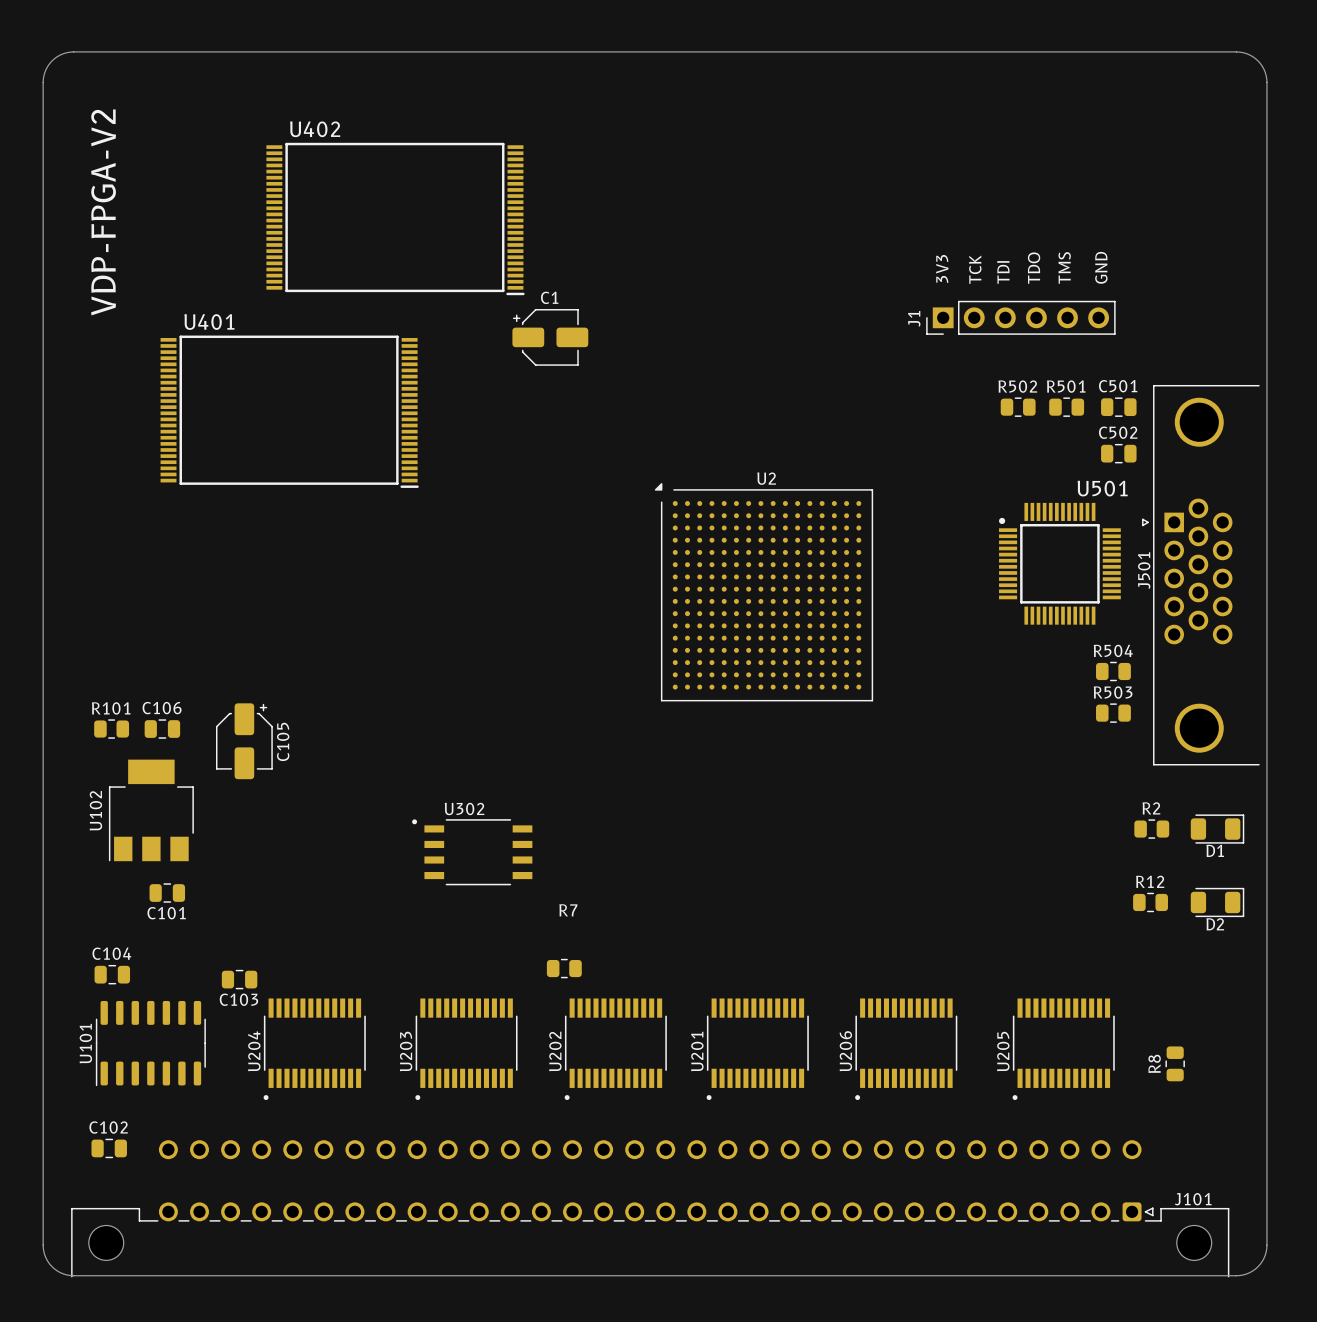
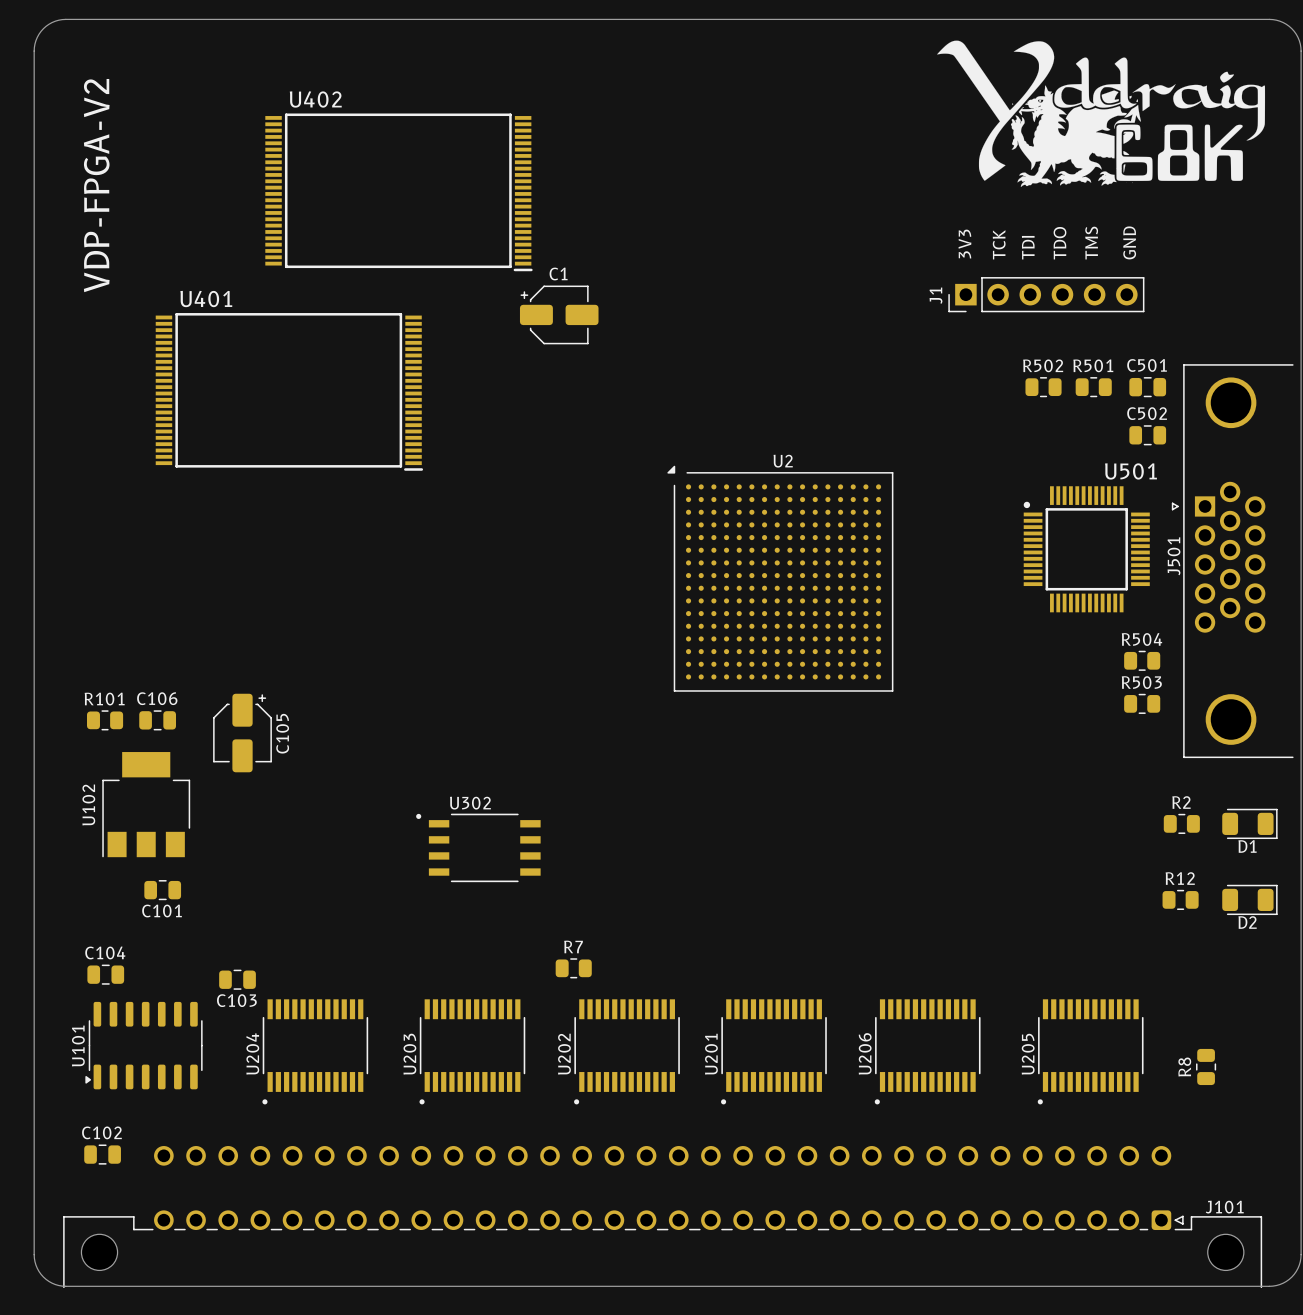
drawing: none -> [937, 40, 1266, 187]
R7 name position: R7 (568, 910) -> R7 (573, 946)
U101 footprint: [95, 1000, 206, 1087] -> [85, 1001, 203, 1090]

